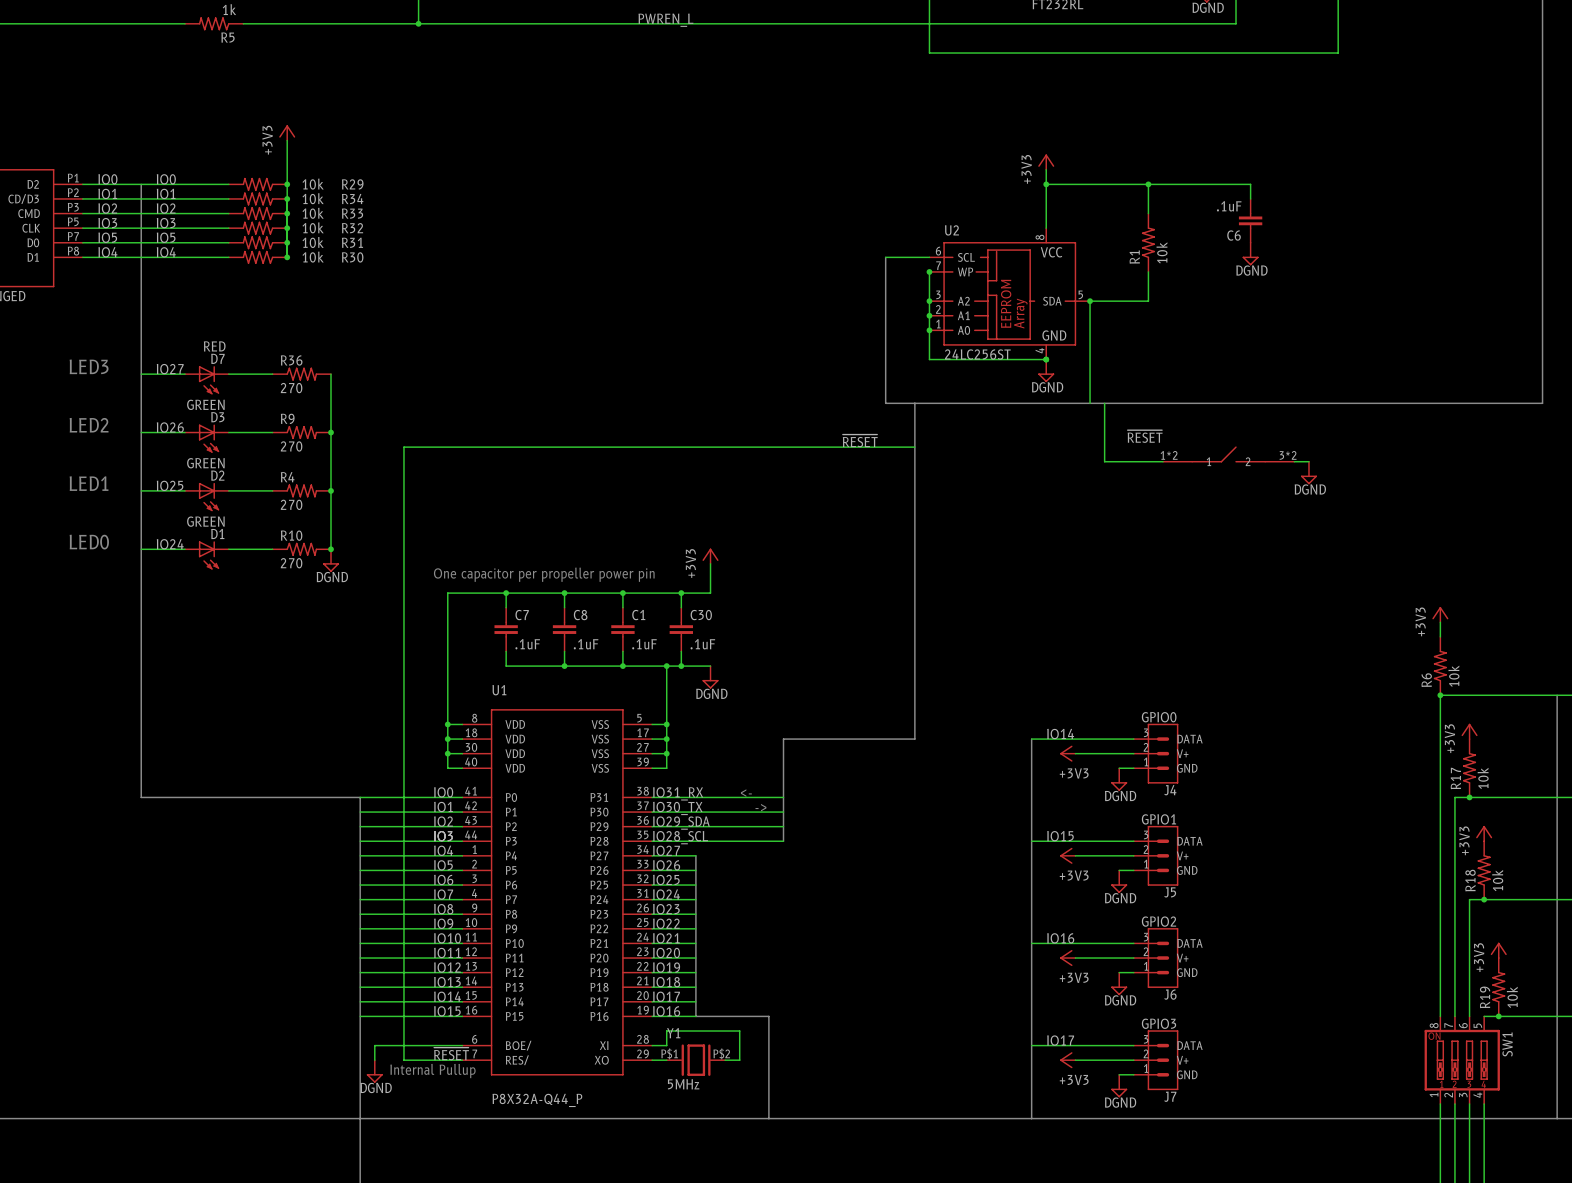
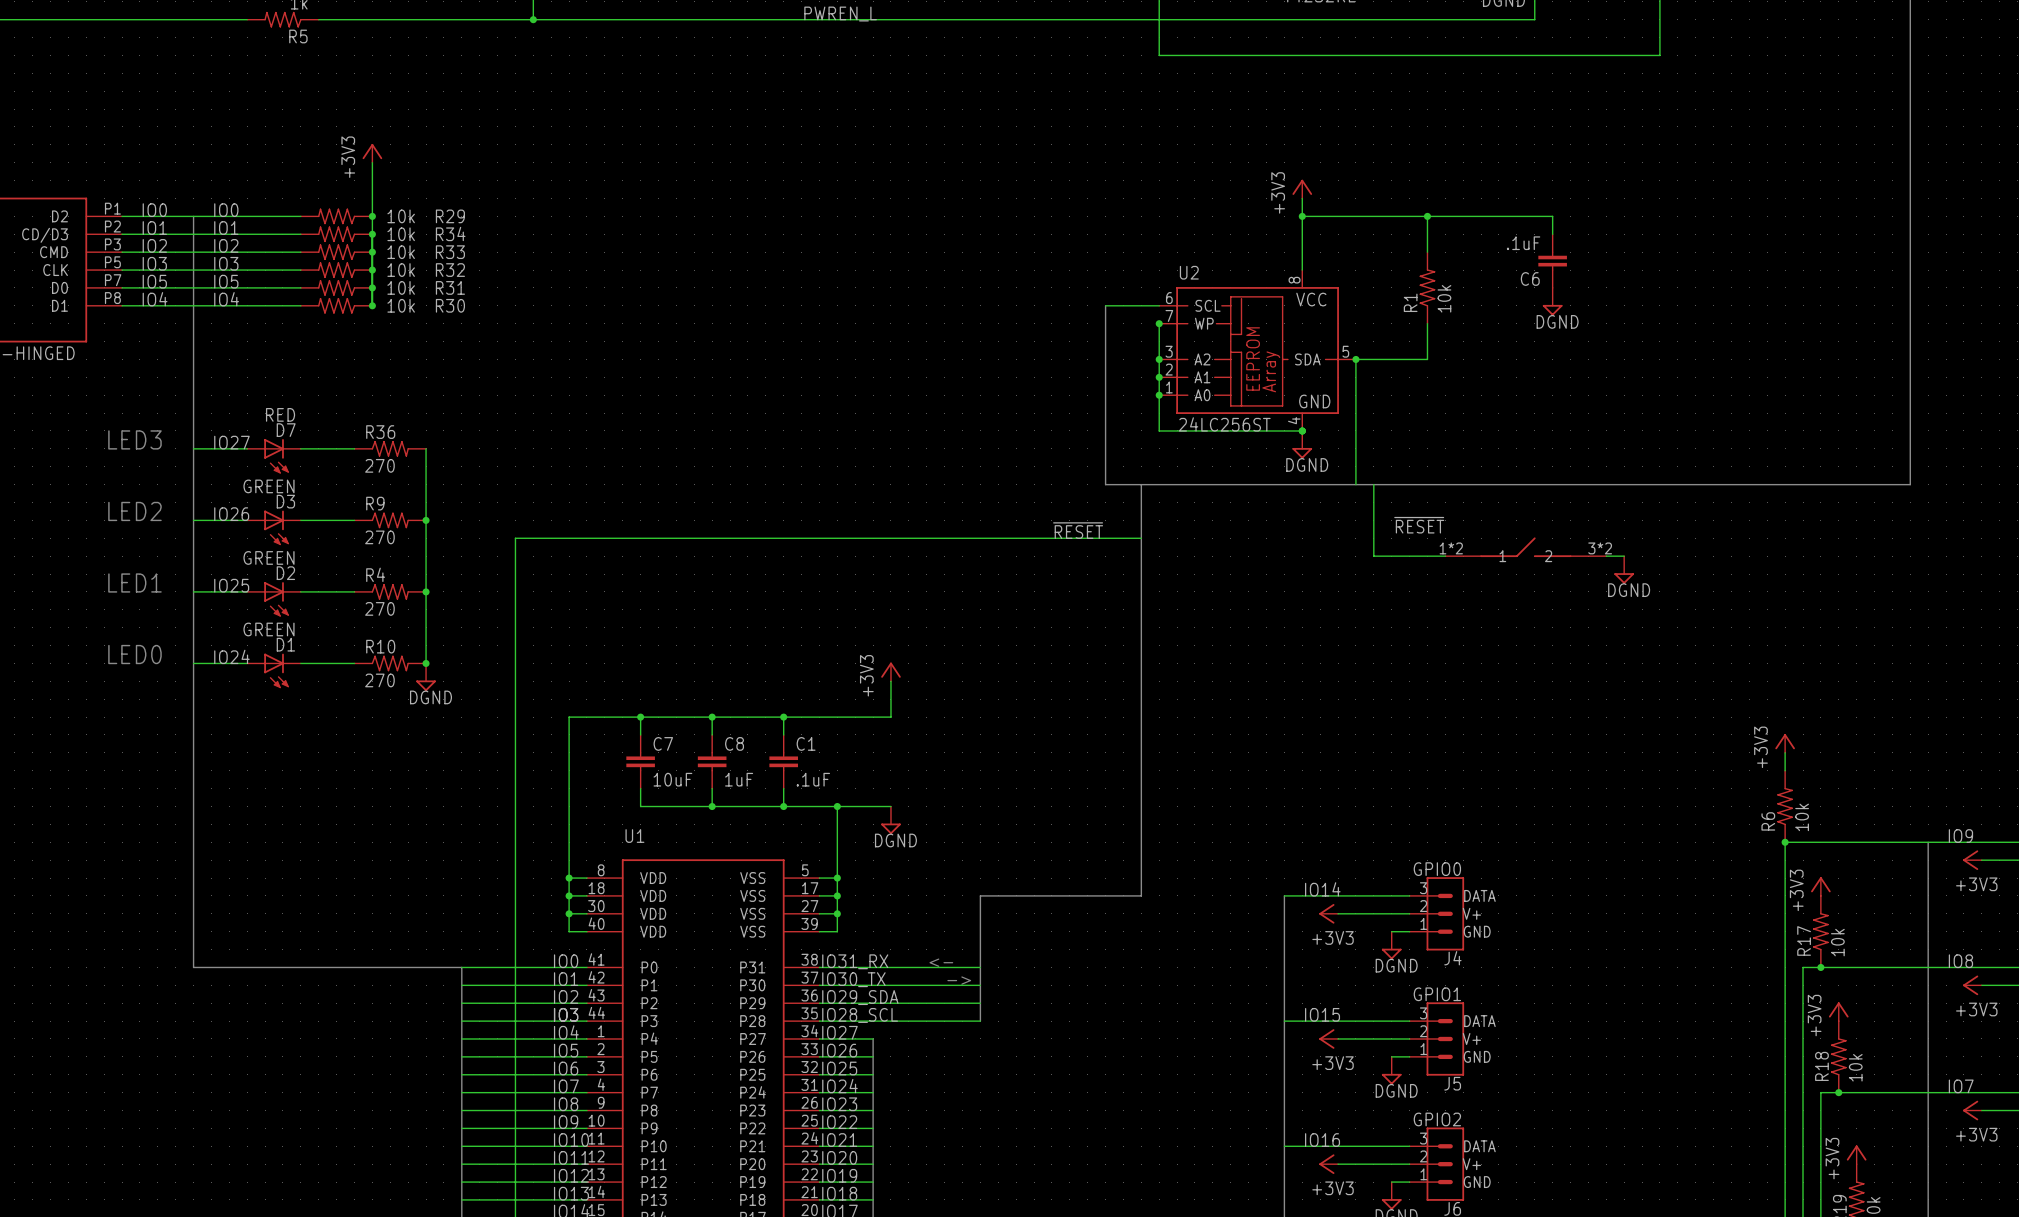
text: One capacitor per propeller power pin (544, 574) -> none
wire: (681, 593) (681, 607) -> none
junction: (681, 593) -> none
C30: .1uF (681, 629) -> none
C7 value: .1uF (527, 644) -> 10uF (672, 779)
C8 value: .1uF (586, 644) -> 1uF (739, 779)
wire: (681, 651) (681, 666) -> none
junction: (681, 666) -> none

